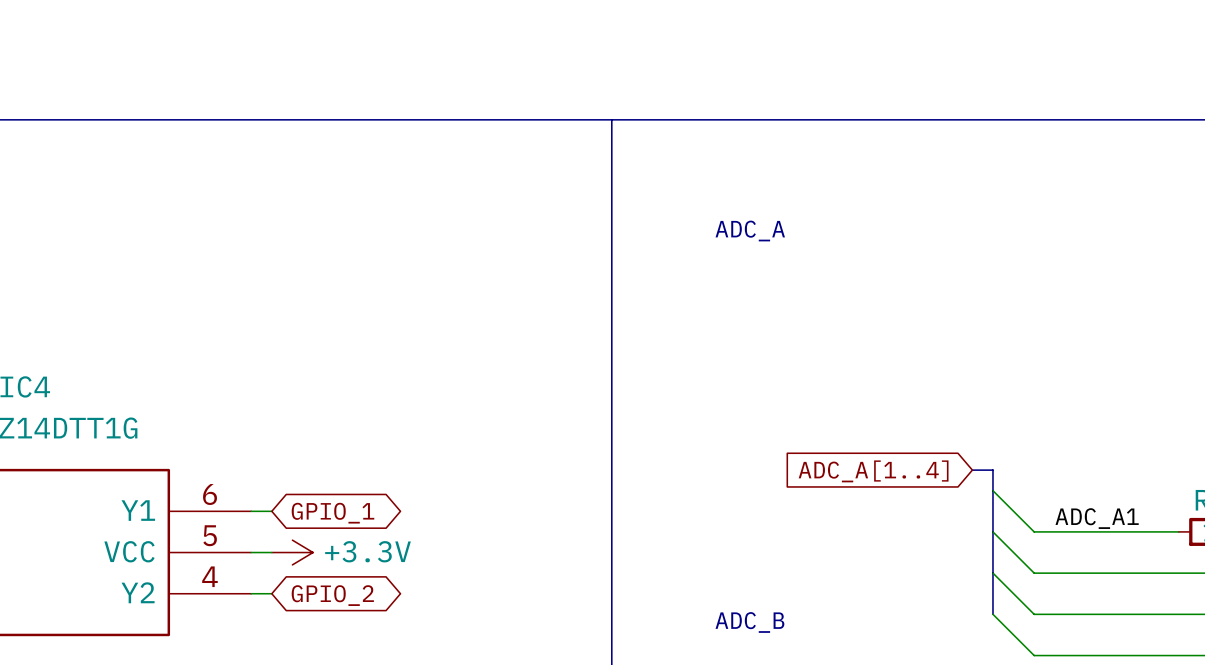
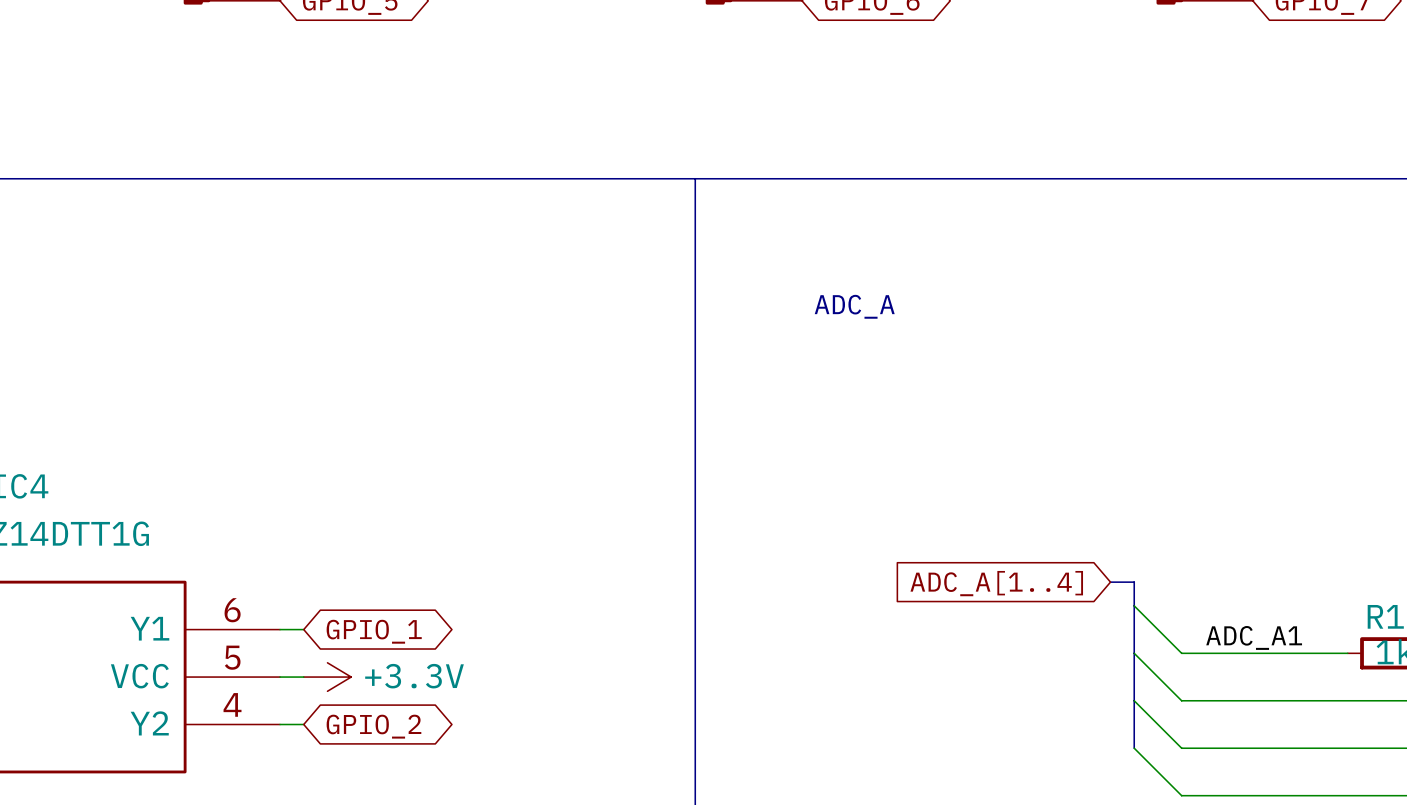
text: ADC_B (749, 622) -> none

